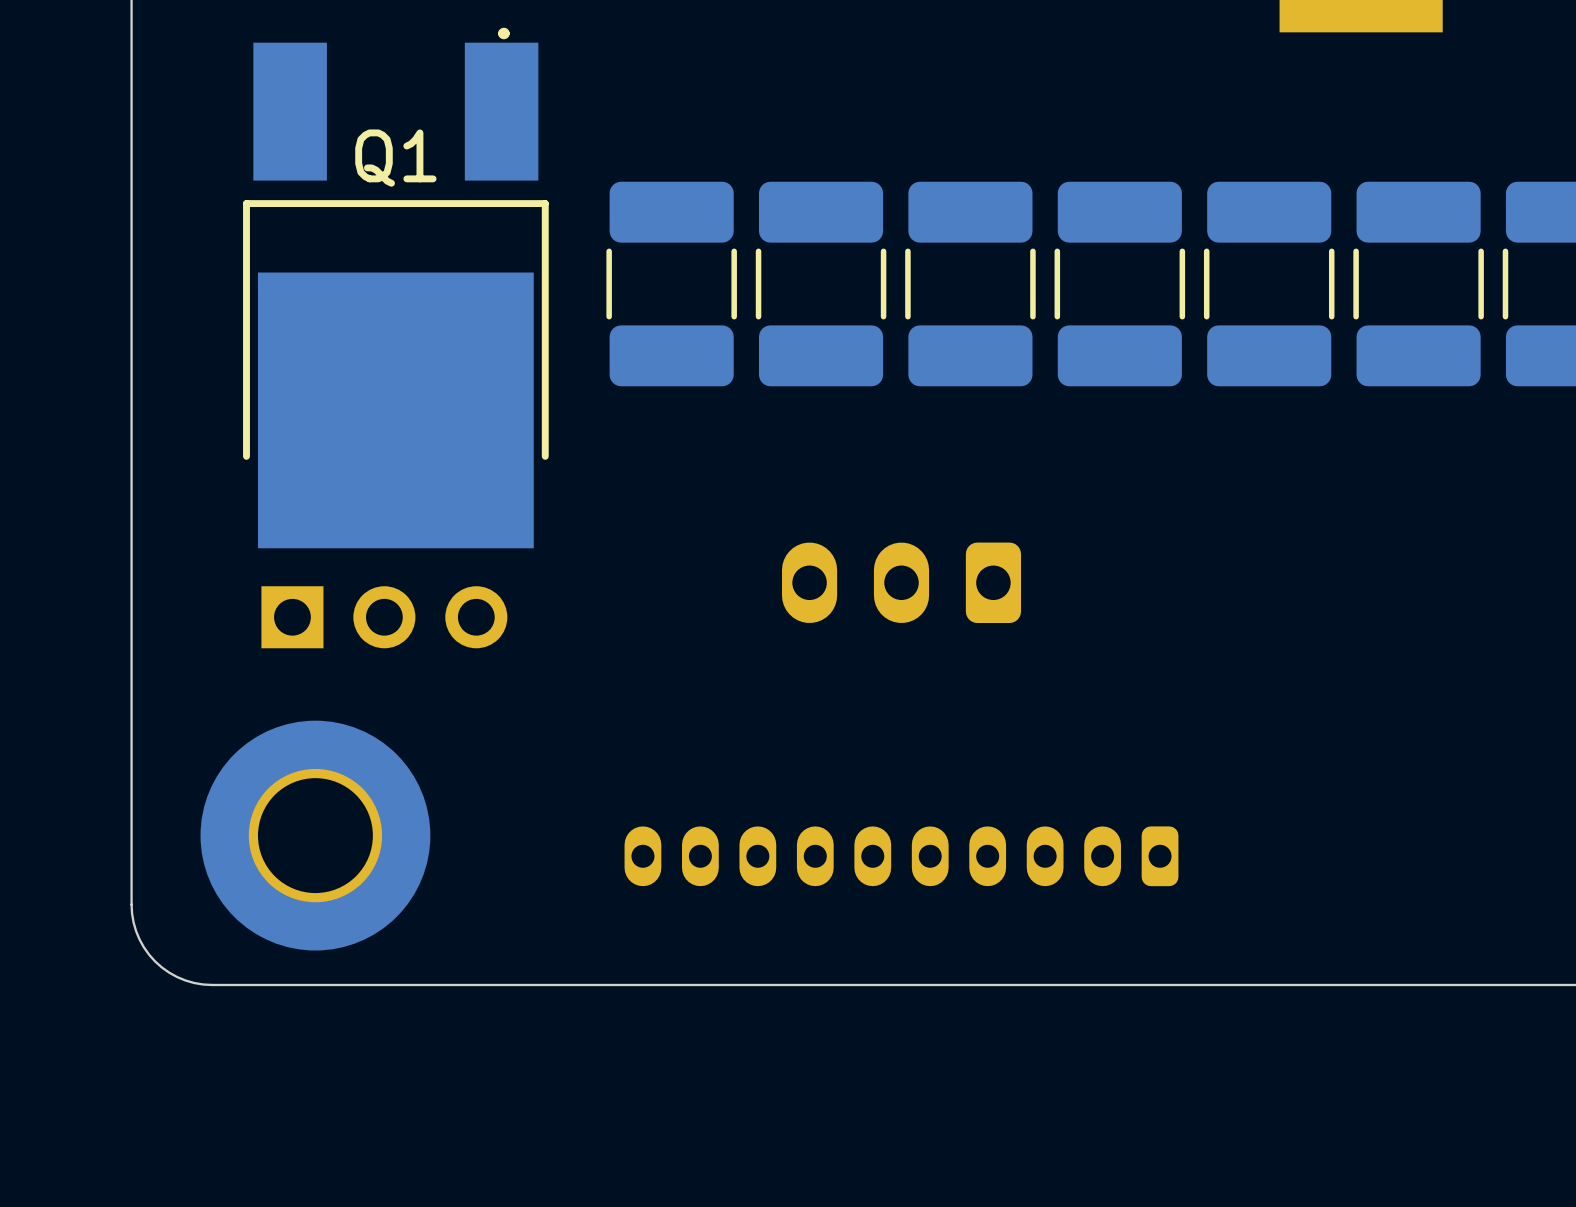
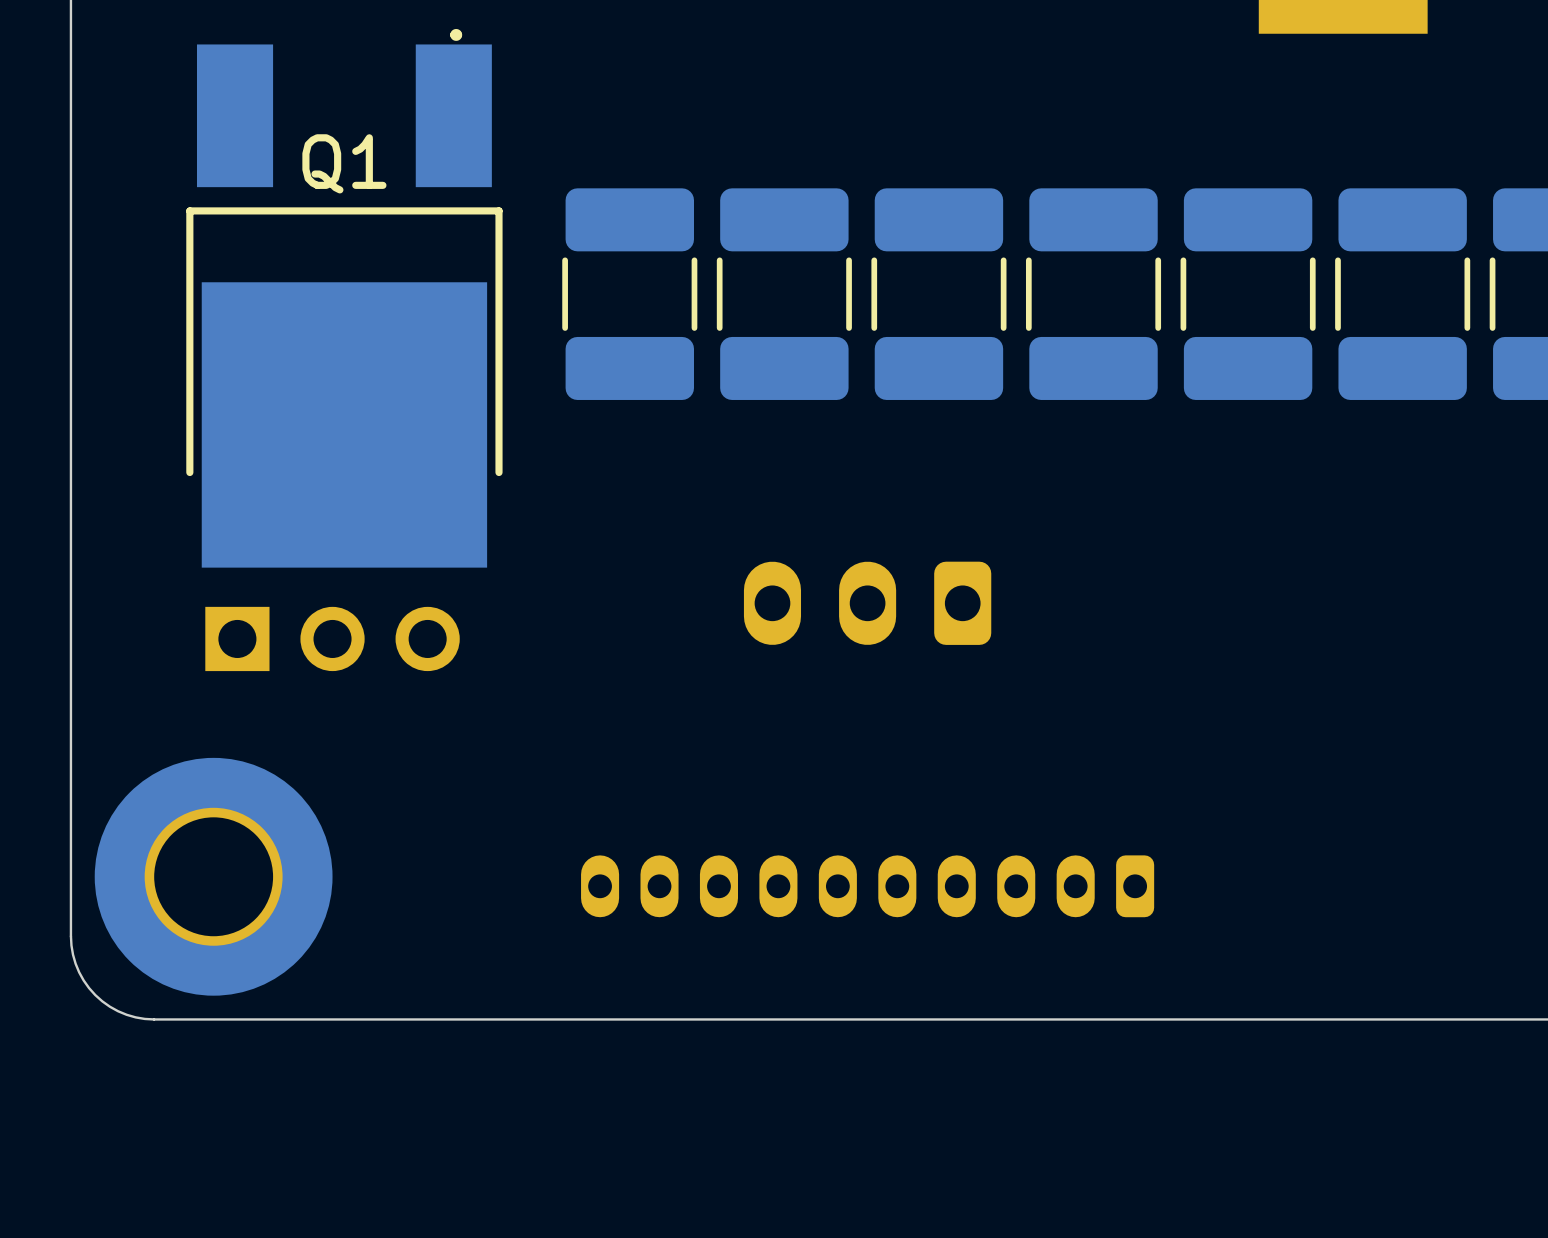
part position: (315, 835) -> (213, 876)

